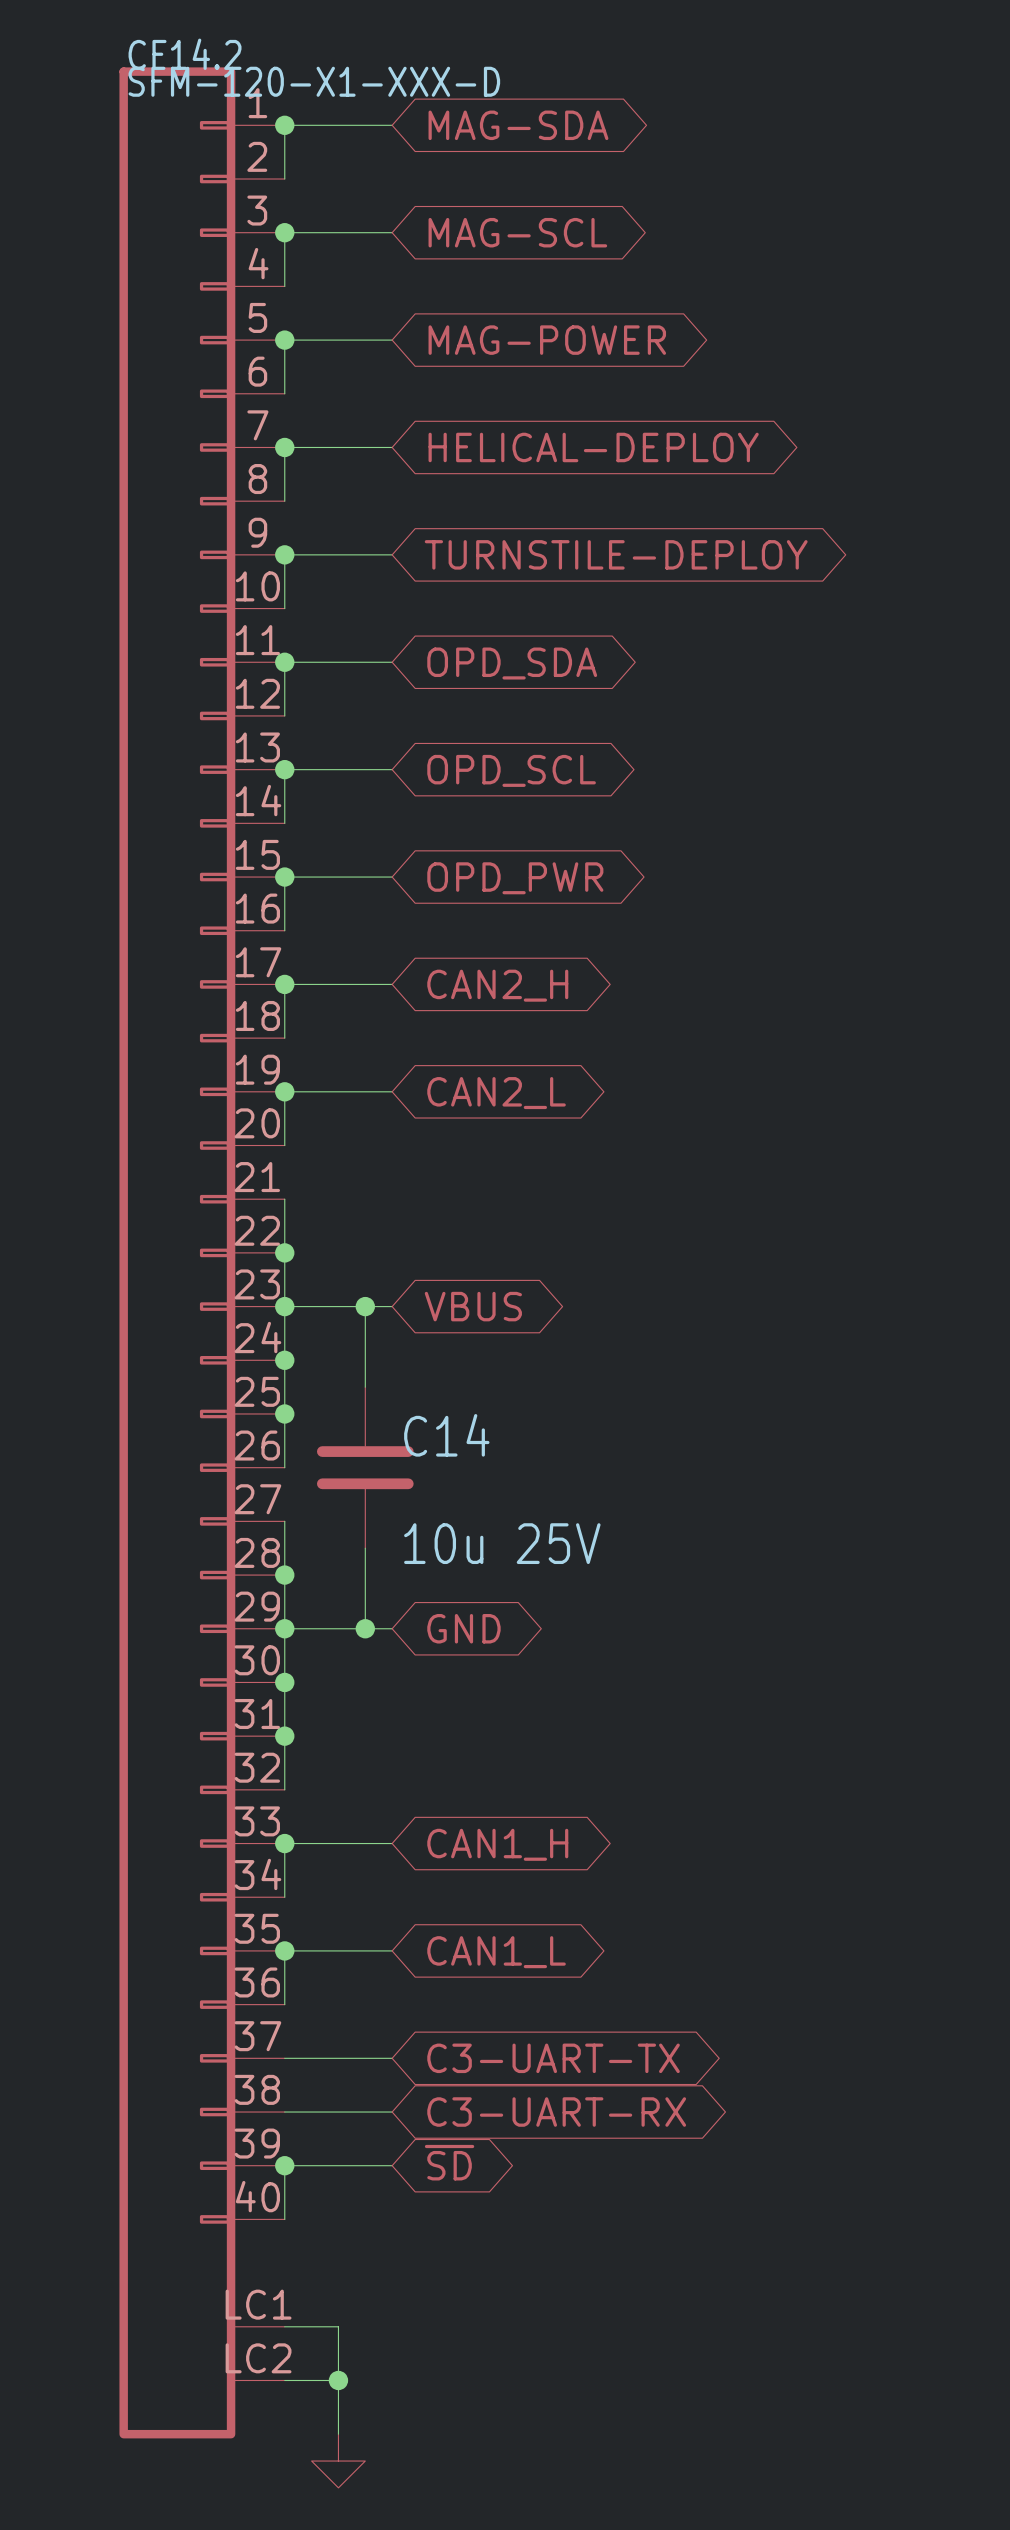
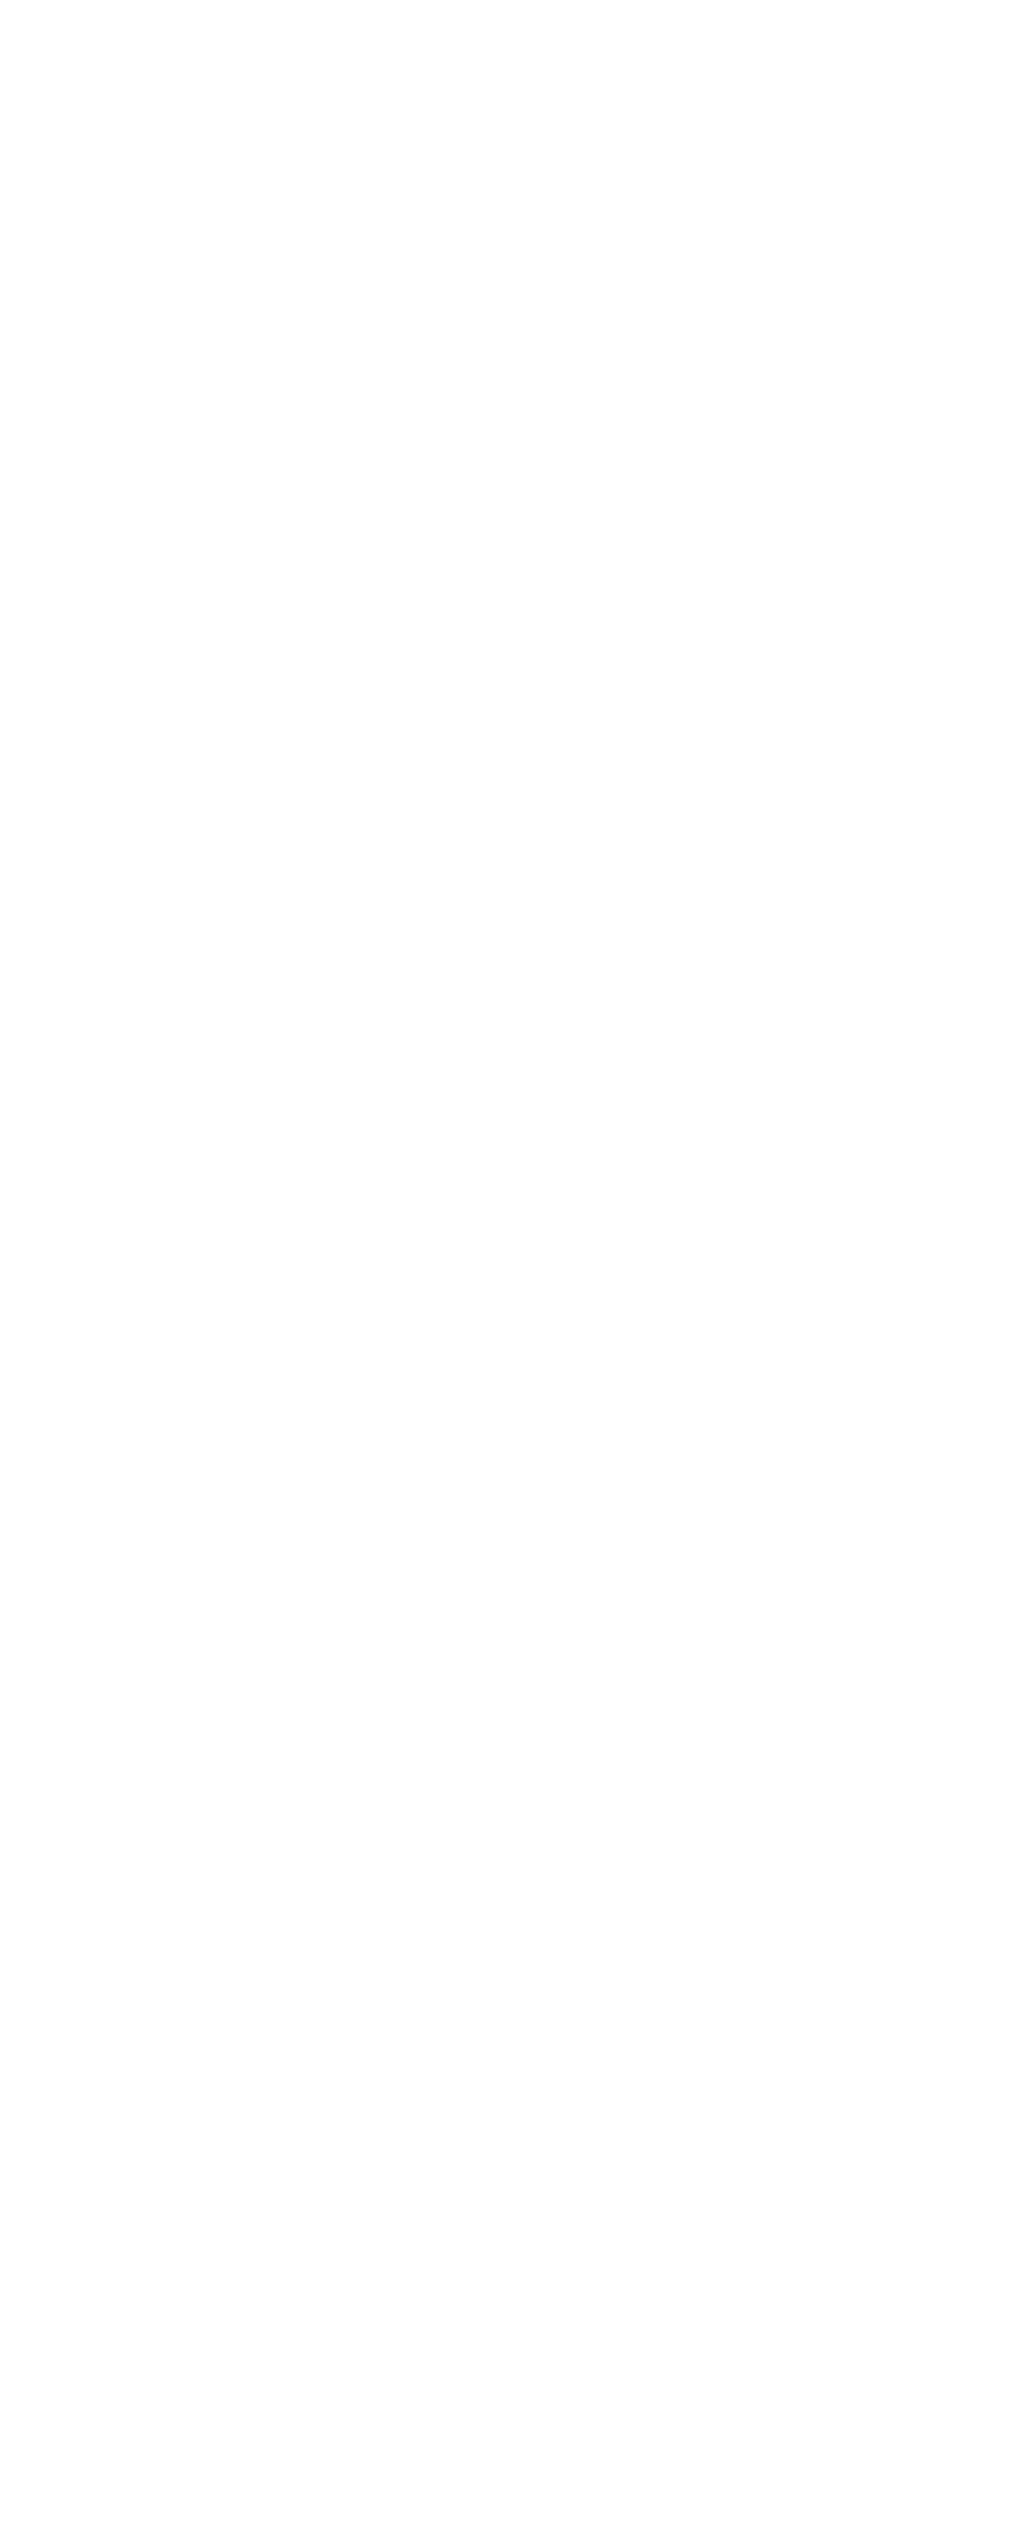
junction: (284, 125) -> none
wire: (392, 125) (284, 125) (284, 179) -> none
global label: MAG-SDA (518, 125) -> none
junction: (284, 232) -> none
wire: (392, 232) (284, 232) (284, 286) -> none
global label: MAG-SCL (517, 232) -> none
junction: (284, 340) -> none
wire: (392, 340) (284, 340) (284, 393) -> none
global label: MAG-POWER (547, 340) -> none
junction: (284, 447) -> none
wire: (392, 447) (284, 447) (284, 501) -> none
global label: HELICAL-DEPLOY (593, 447) -> none
junction: (284, 554) -> none
wire: (392, 554) (284, 554) (284, 608) -> none
global label: TURNSTILE-DEPLOY (616, 554) -> none
junction: (284, 662) -> none
wire: (392, 662) (284, 662) (284, 715) -> none
global label: OPD_SDA (512, 663) -> none
junction: (284, 769) -> none
wire: (392, 769) (284, 769) (284, 823) -> none
global label: OPD_SCL (511, 770) -> none
junction: (284, 877) -> none
wire: (392, 877) (284, 877) (284, 930) -> none
global label: OPD_PWR (515, 878) -> none
junction: (284, 984) -> none
wire: (392, 984) (284, 984) (284, 1038) -> none
global label: CAN2_H (497, 985) -> none
junction: (284, 1091) -> none
wire: (392, 1091) (284, 1091) (284, 1145) -> none
global label: CAN2_L (496, 1093) -> none
wire: (284, 1199) (284, 1467) -> none
CF14.2: SFM-120-X1-XXX-D (202, 1252) -> none
junction: (284, 1252) -> none
wire: (284, 1306) (392, 1306) -> none
junction: (284, 1306) -> none
wire: (365, 1306) (365, 1387) -> none
junction: (365, 1306) -> none
global label: VBUS (473, 1306) -> none
junction: (284, 1360) -> none
junction: (284, 1413) -> none
C14: 10u 25V (365, 1467) -> none
wire: (284, 1521) (284, 1789) -> none
wire: (365, 1548) (365, 1628) -> none
junction: (284, 1575) -> none
wire: (284, 1628) (392, 1628) -> none
junction: (284, 1628) -> none
junction: (365, 1628) -> none
global label: GND (463, 1628) -> none
junction: (284, 1682) -> none
junction: (284, 1736) -> none
junction: (284, 1843) -> none
wire: (392, 1843) (284, 1843) (284, 1897) -> none
global label: CAN1_H (497, 1844) -> none
junction: (284, 1950) -> none
wire: (392, 1950) (284, 1950) (284, 2004) -> none
global label: CAN1_L (496, 1952) -> none
wire: (284, 2058) (392, 2058) -> none
global label: C3-UART-TX (553, 2058) -> none
wire: (284, 2112) (392, 2112) -> none
global label: C3-UART-RX (556, 2112) -> none
global label: ~{SD} (449, 2162) -> none
junction: (284, 2165) -> none
wire: (392, 2165) (284, 2165) (284, 2219) -> none
wire: (284, 2326) (338, 2326) (338, 2434) -> none
wire: (284, 2380) (338, 2380) -> none
junction: (338, 2380) -> none
power symbol: (338, 2461) -> none

